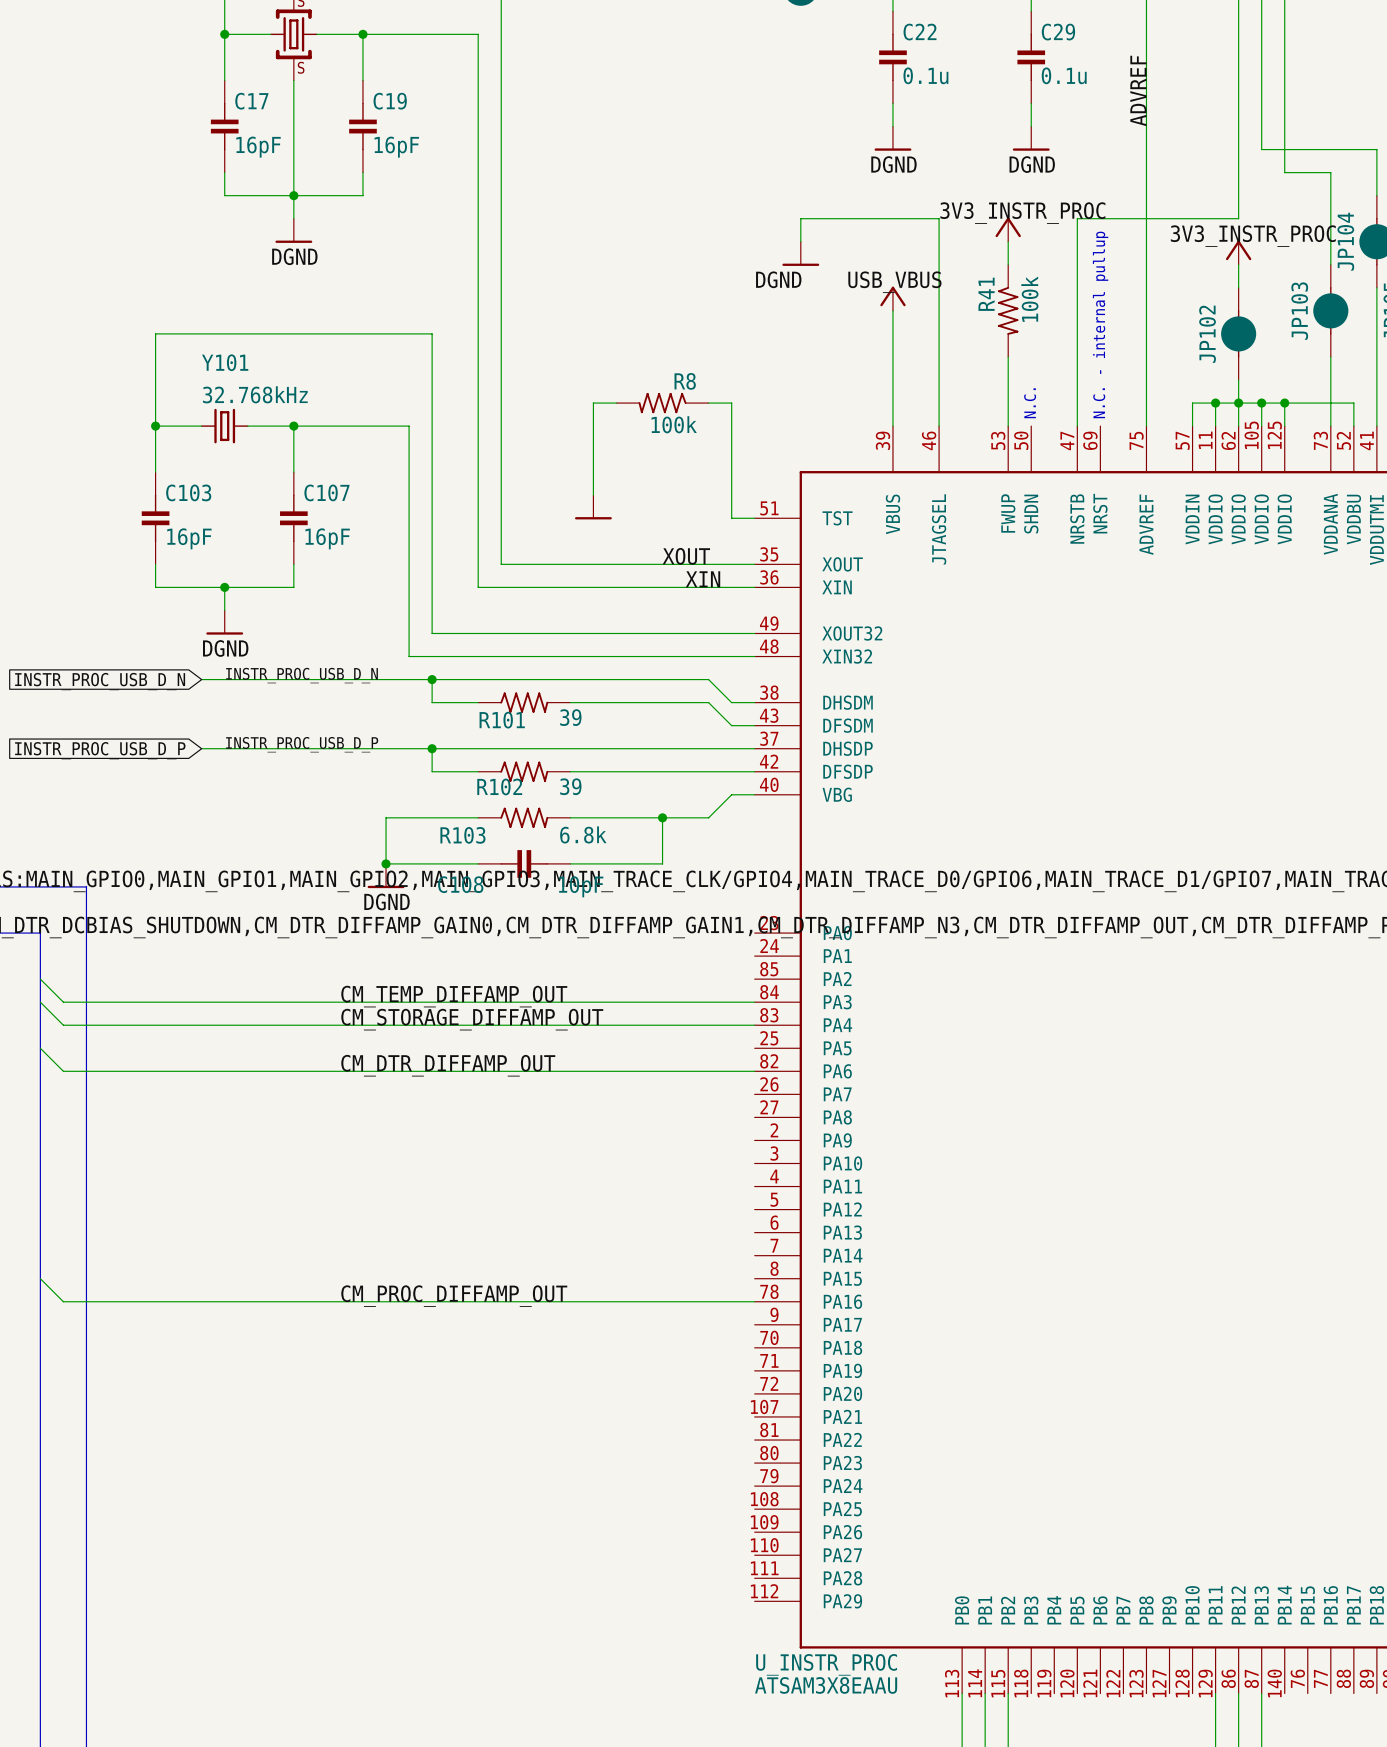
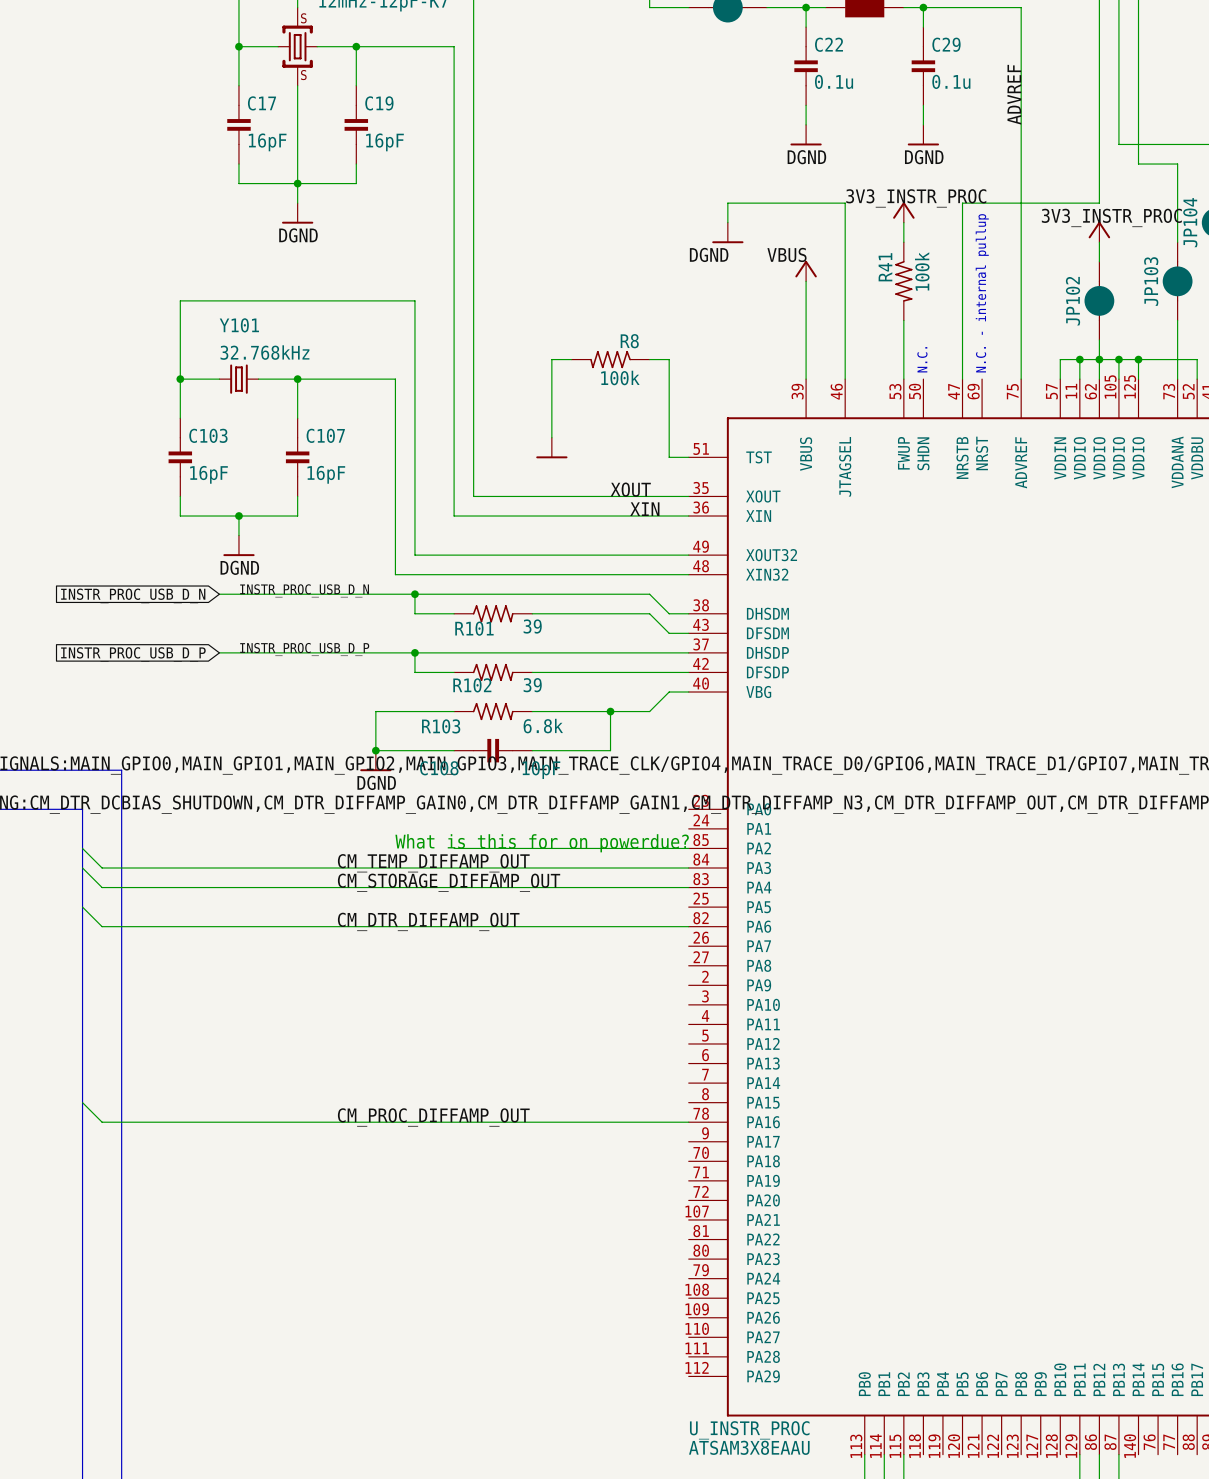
label: USB_VBUS (894, 282) -> VBUS (786, 254)
text: none -> What is this for on powerdue? (542, 843)
wire: none -> (454, 848) (688, 848)

